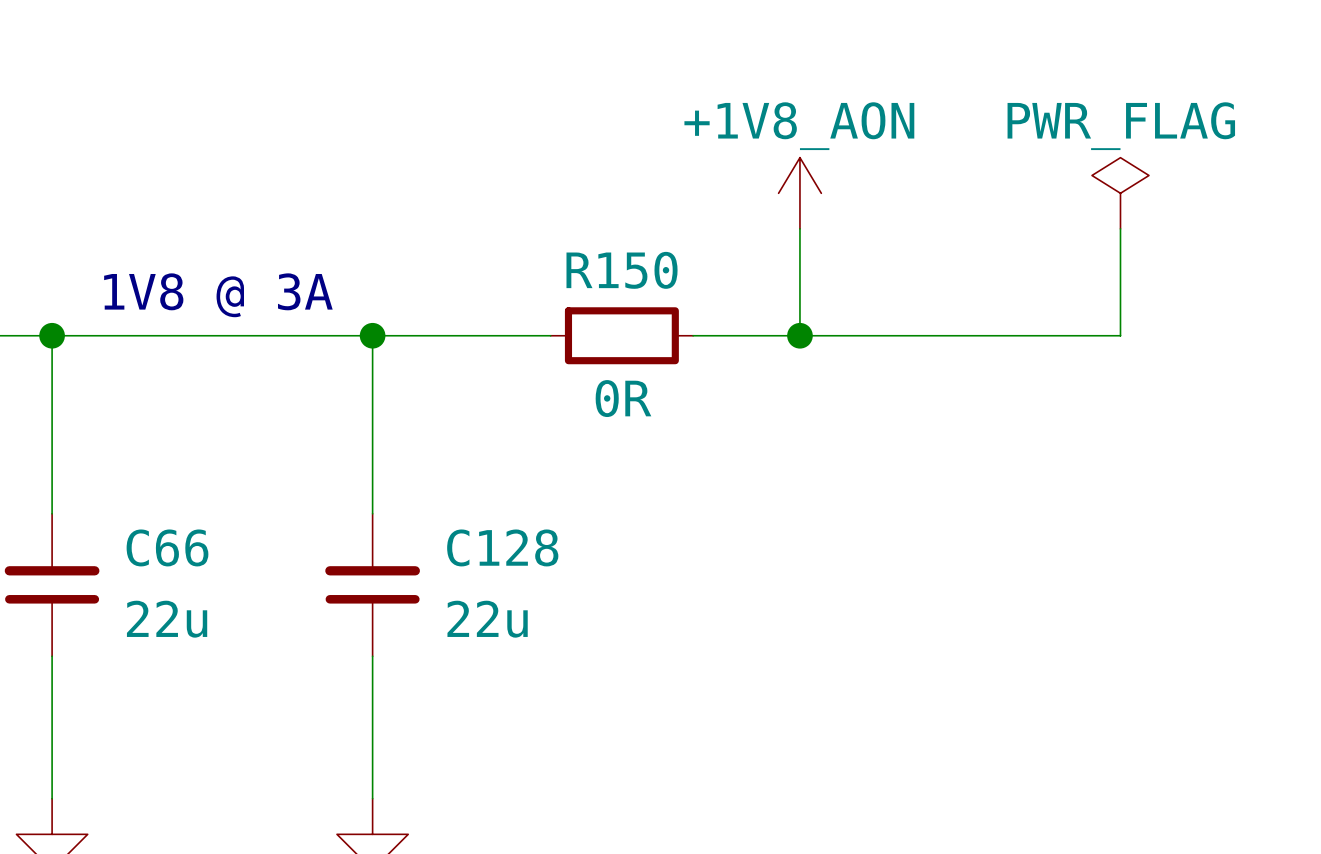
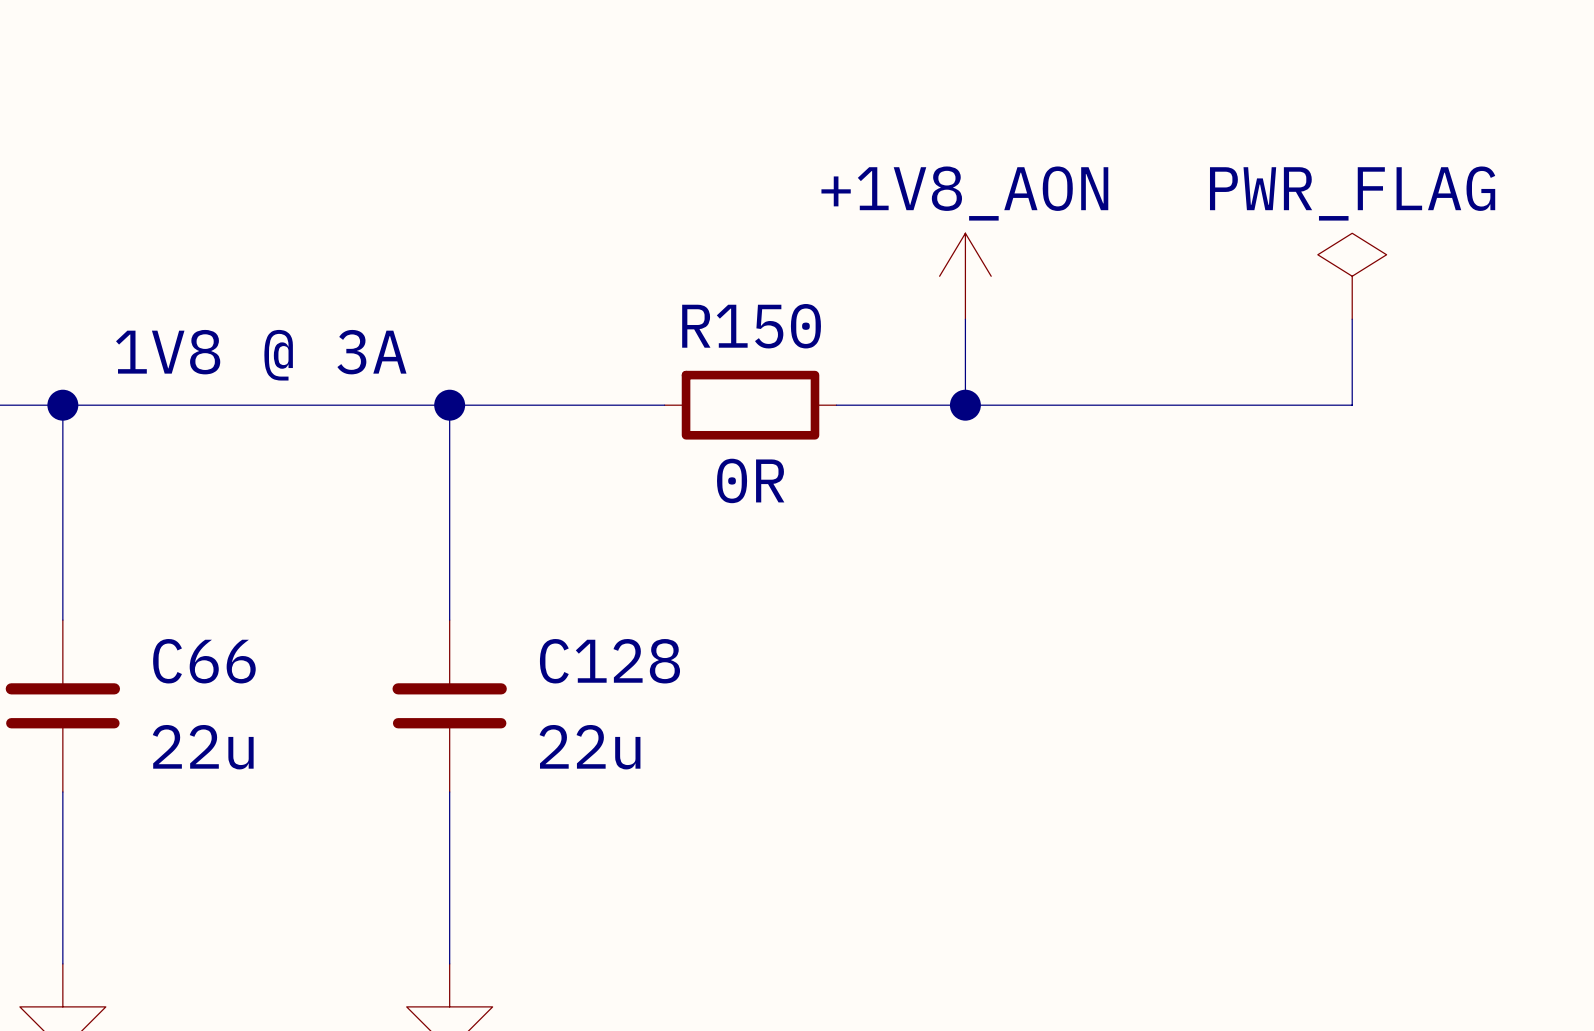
power symbol position: +1V8_AON (799, 193) -> +1V8_AON (965, 276)
power symbol position: PWR_FLAG (1120, 193) -> PWR_FLAG (1352, 276)

